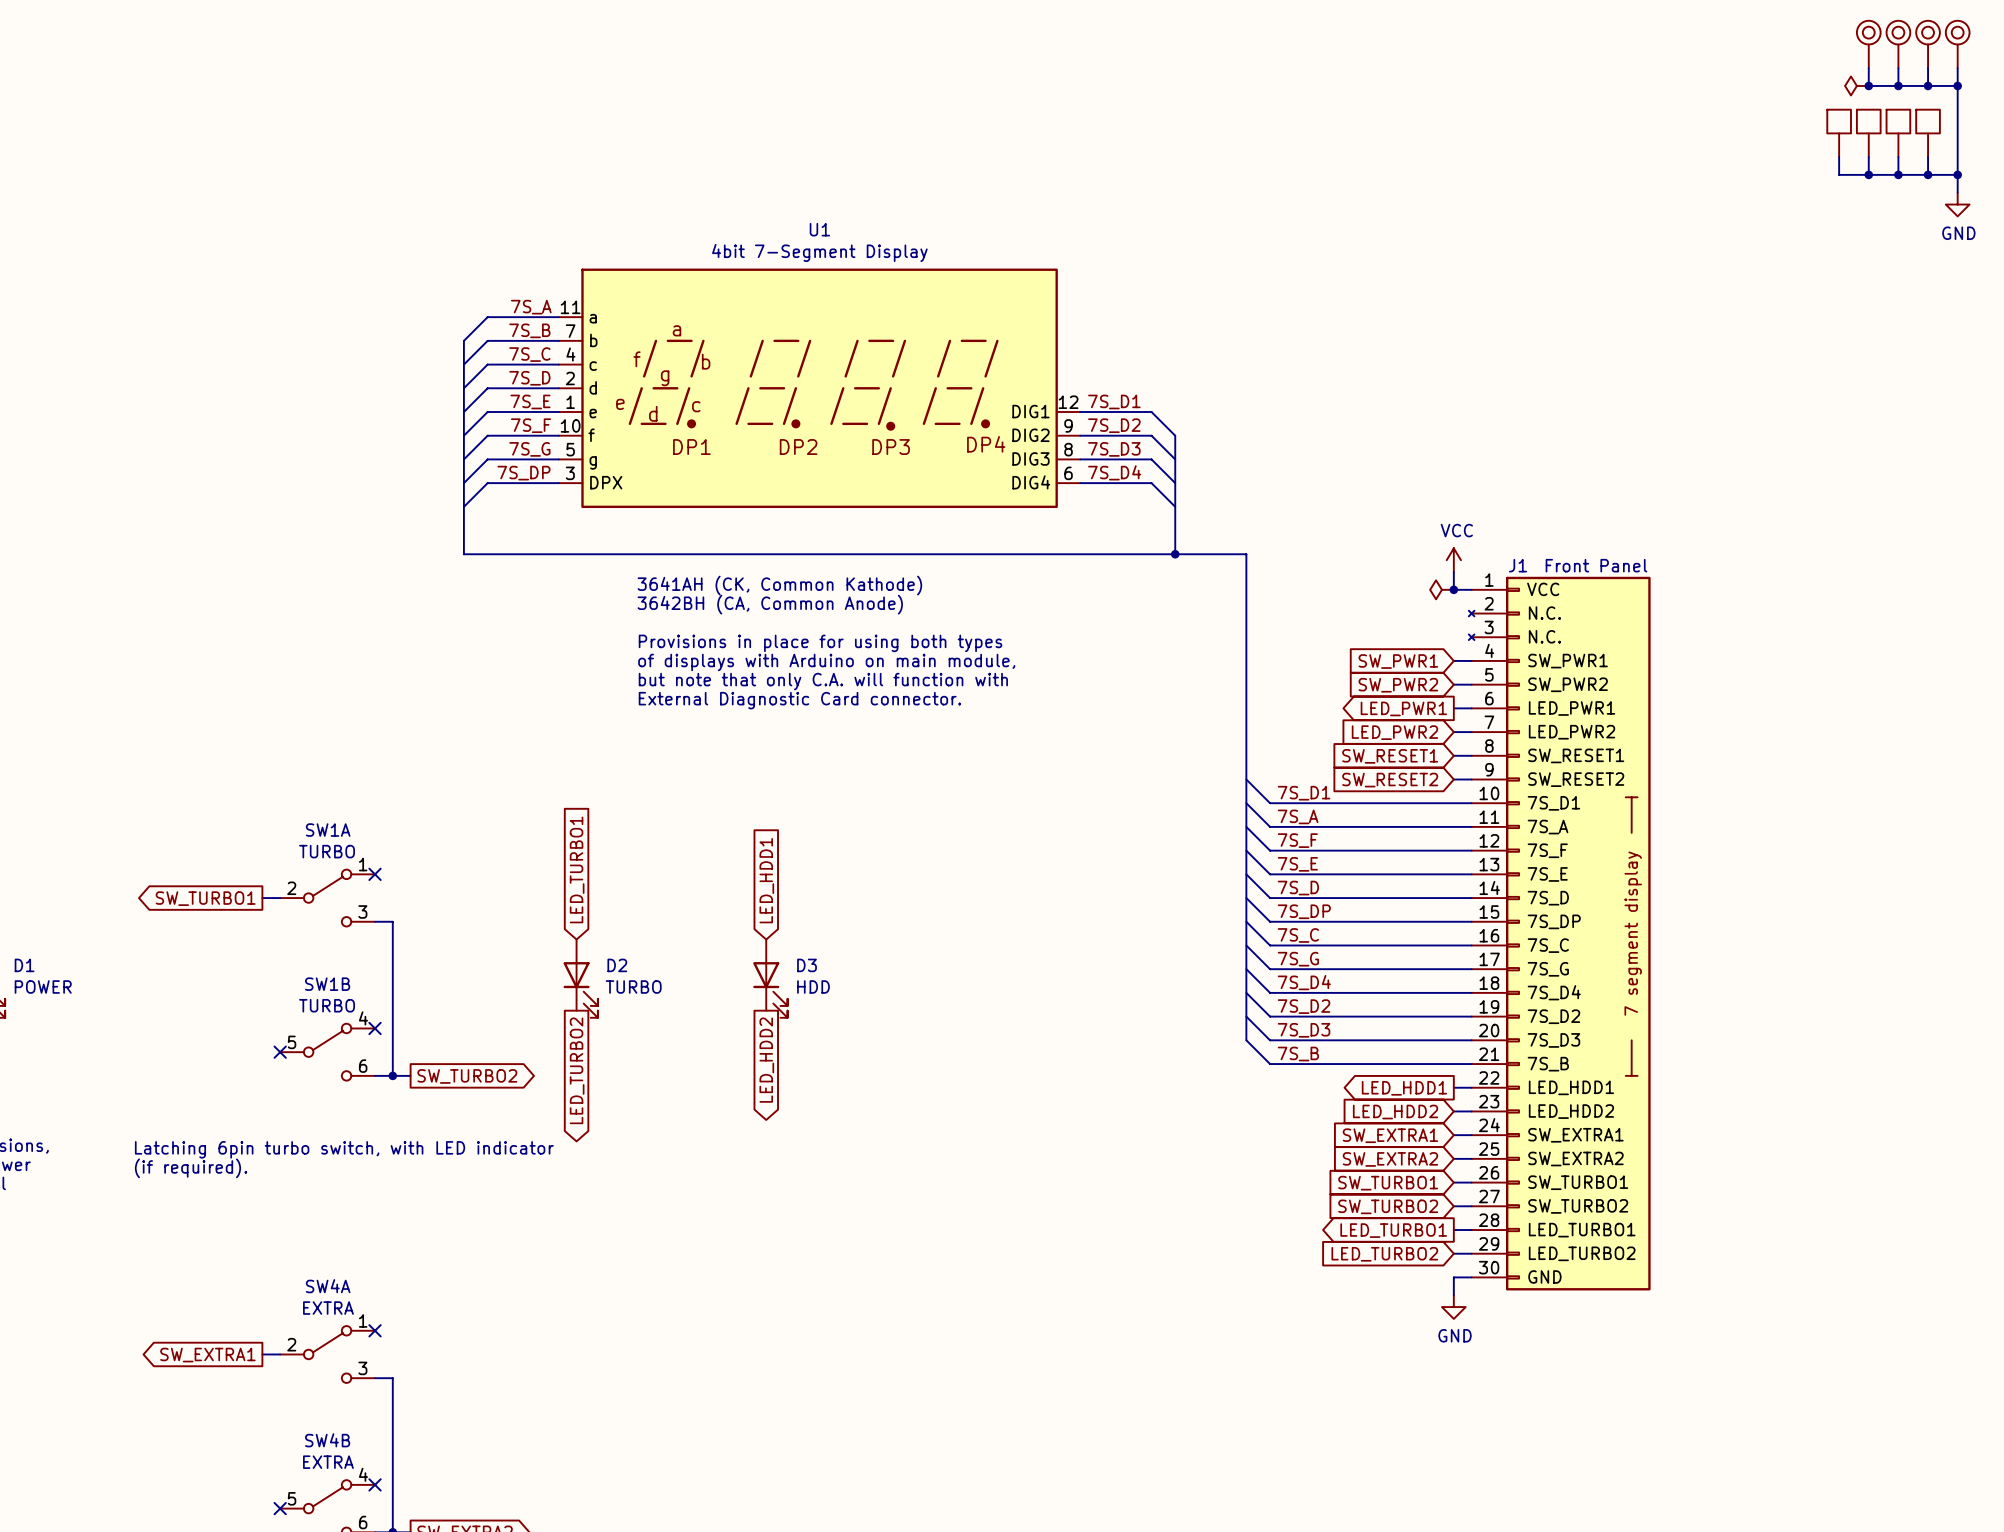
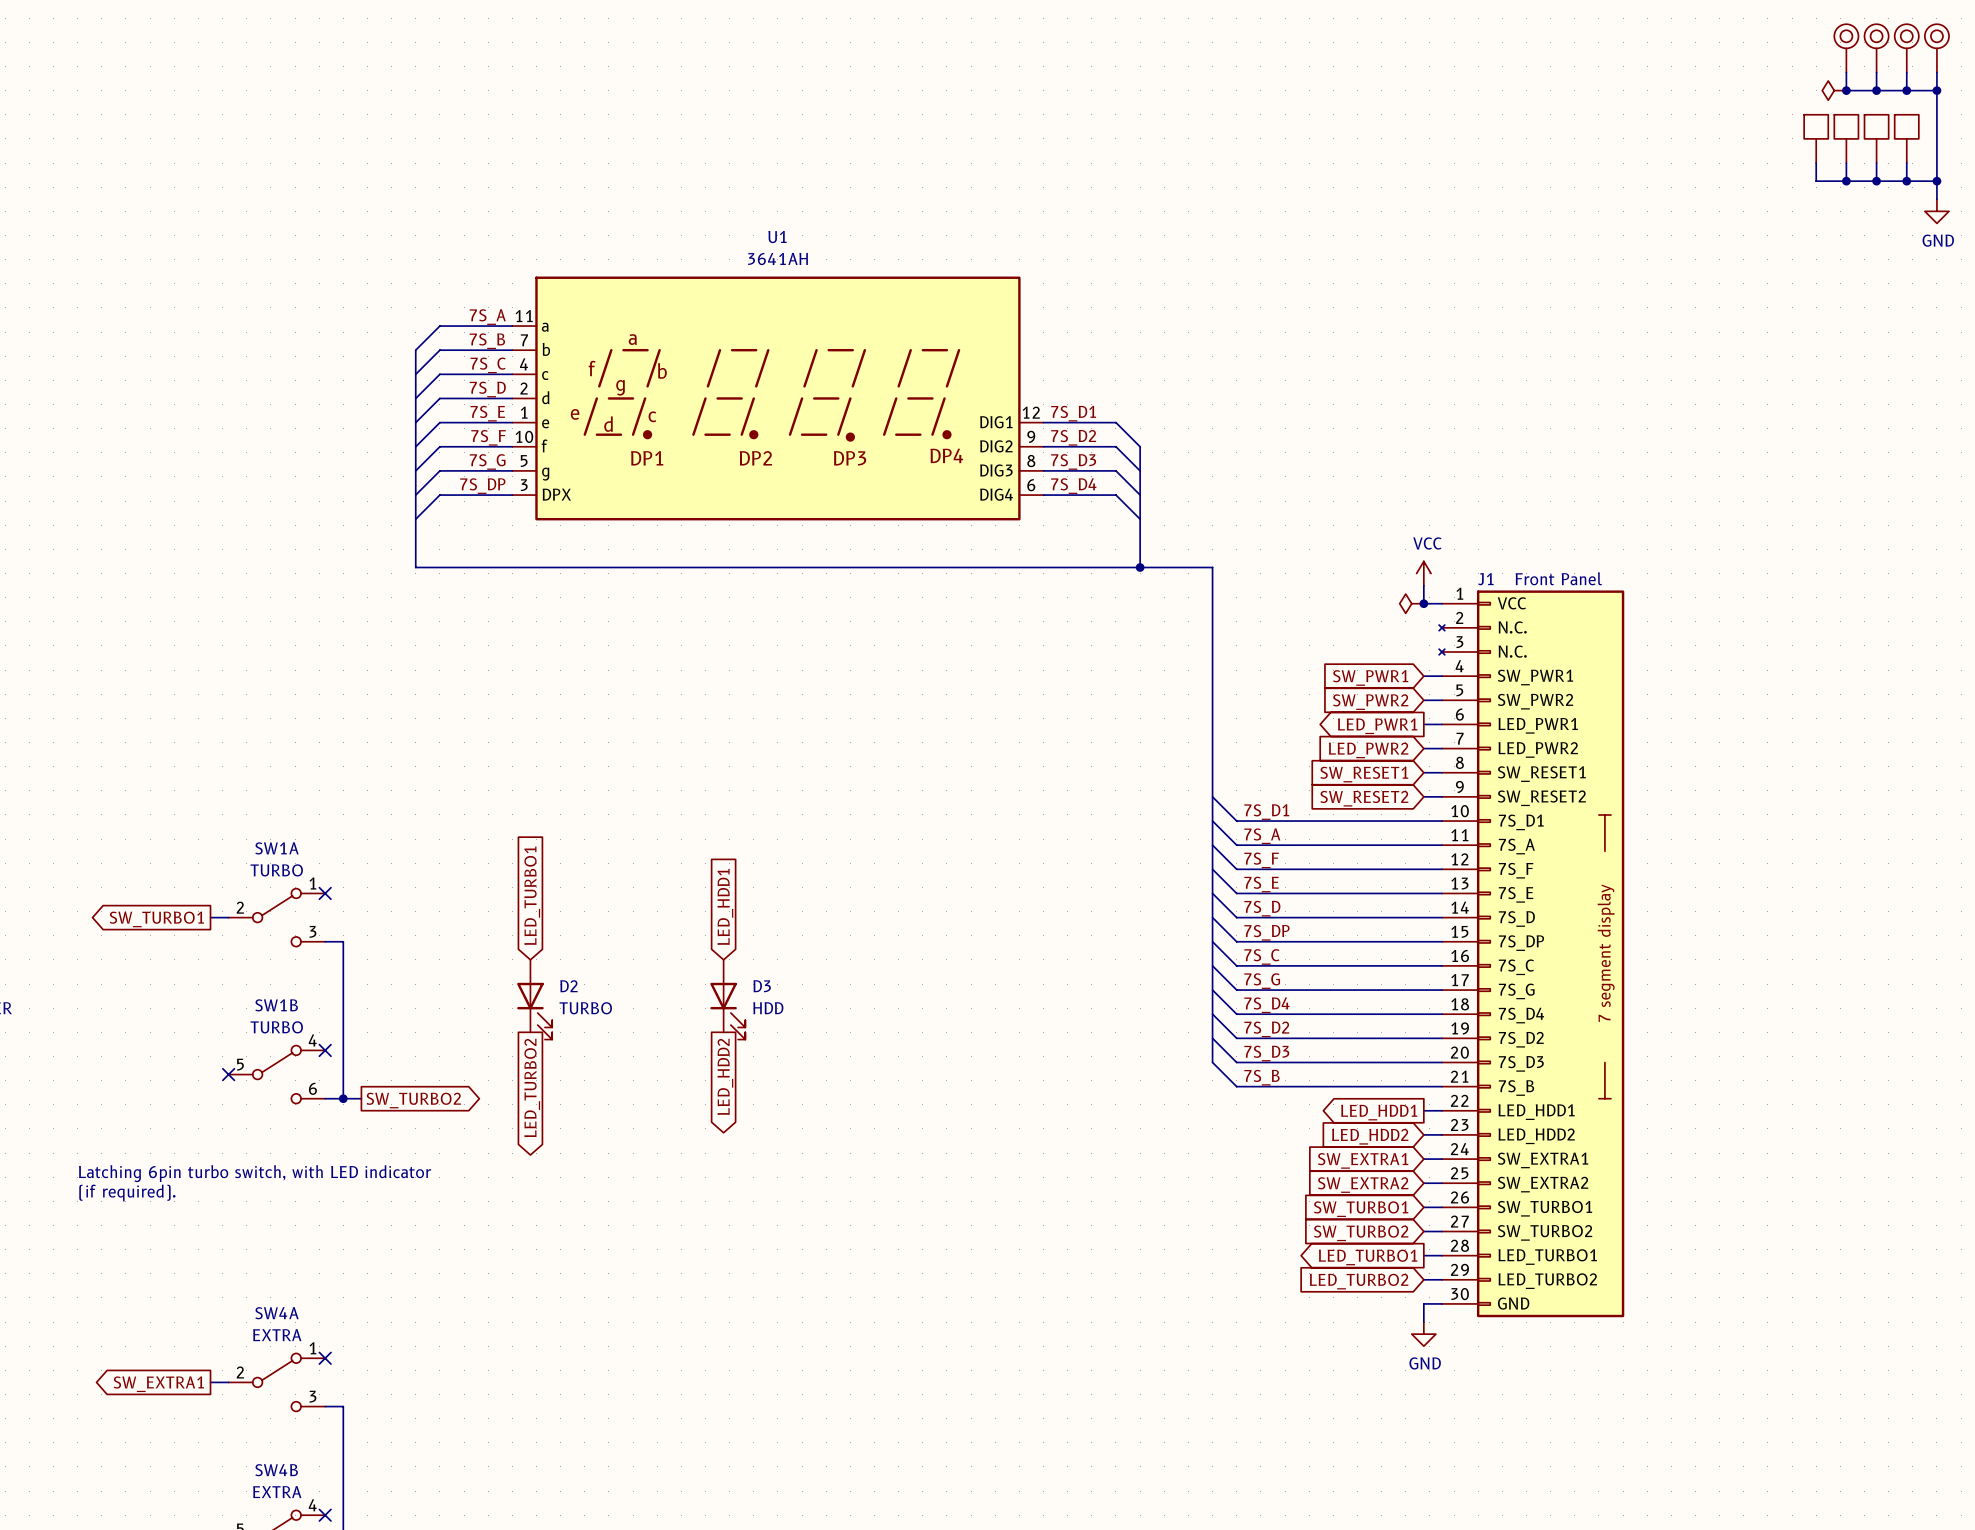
U1 value: 4bit 7-Segment Display (819, 252) -> 3641AH (778, 259)
text: 3641AH (CK, Common Kathode) (779, 585) -> none
text: 3642BH (CA, Common Anode) (770, 604) -> none
text: Provisions in place for using both types (820, 643) -> none
text: of displays with Arduino on main module, (826, 662) -> none
text: but note that only C.A. will function with (823, 681) -> none
text: External Diagnostic Card connector. (799, 700) -> none

